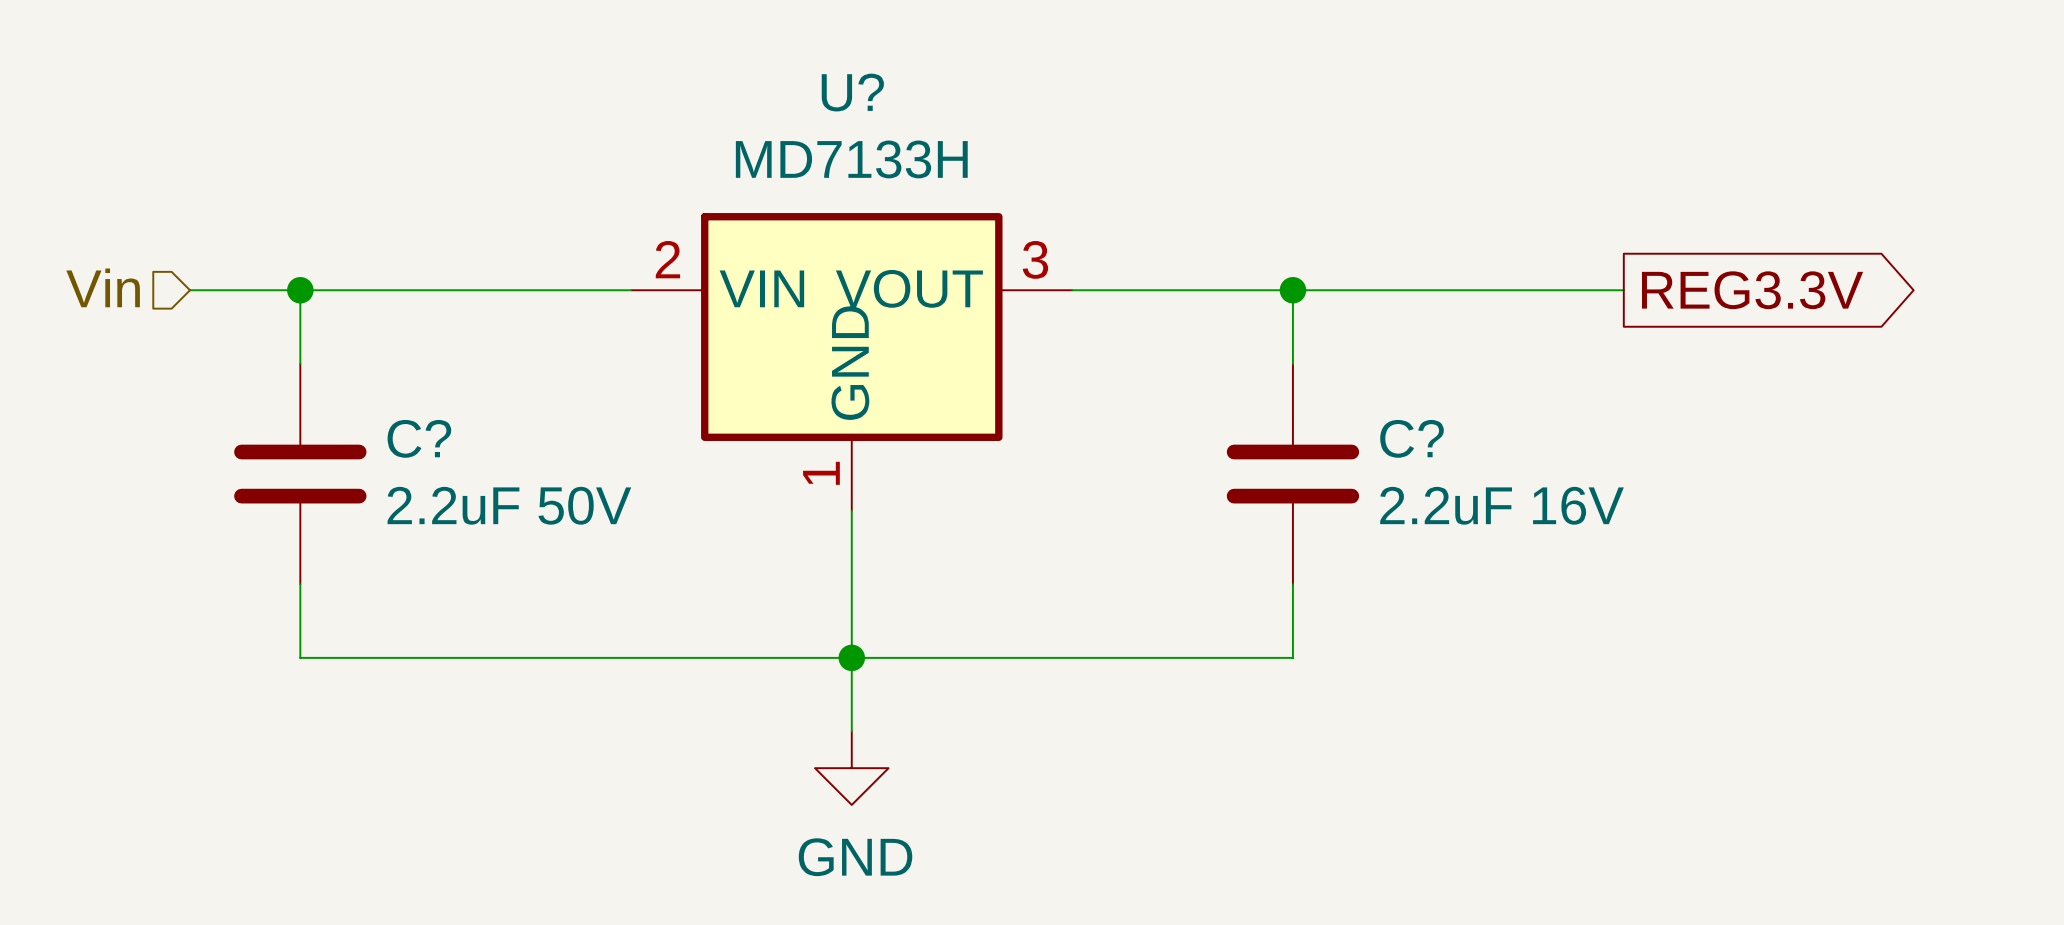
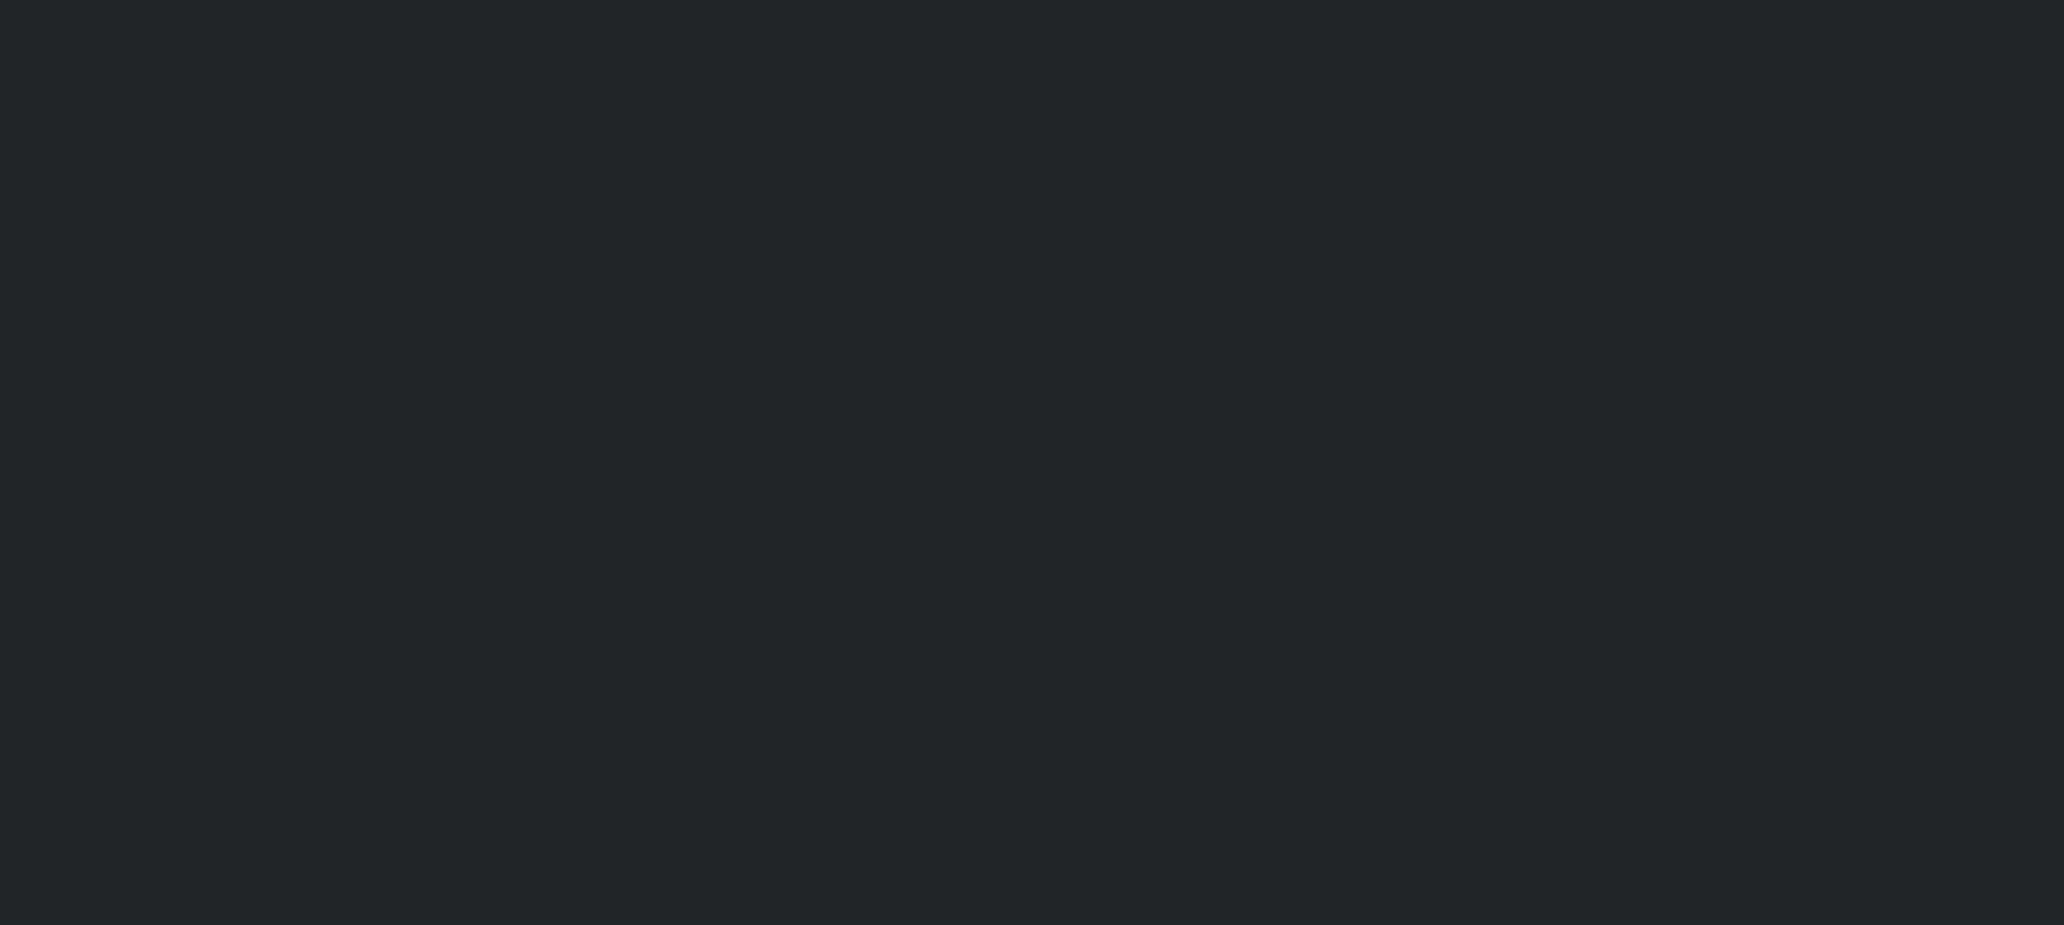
hierarchical label: Vin (103, 287) -> none
wire: (190, 290) (631, 290) -> none
wire: (300, 290) (300, 363) -> none
junction: (300, 290) -> none
wire: (1072, 290) (1623, 290) -> none
wire: (1292, 290) (1292, 363) -> none
junction: (1292, 290) -> none
global label: REG3.3V (1752, 290) -> none
U?: MD7133H (851, 361) -> none
C?: 2.2uF 50V (300, 474) -> none
C?: 2.2uF 16V (1292, 474) -> none
wire: (851, 510) (851, 731) -> none
wire: (300, 584) (300, 657) (1292, 657) (1292, 584) -> none
junction: (851, 657) -> none
power symbol: GND (851, 768) -> none

